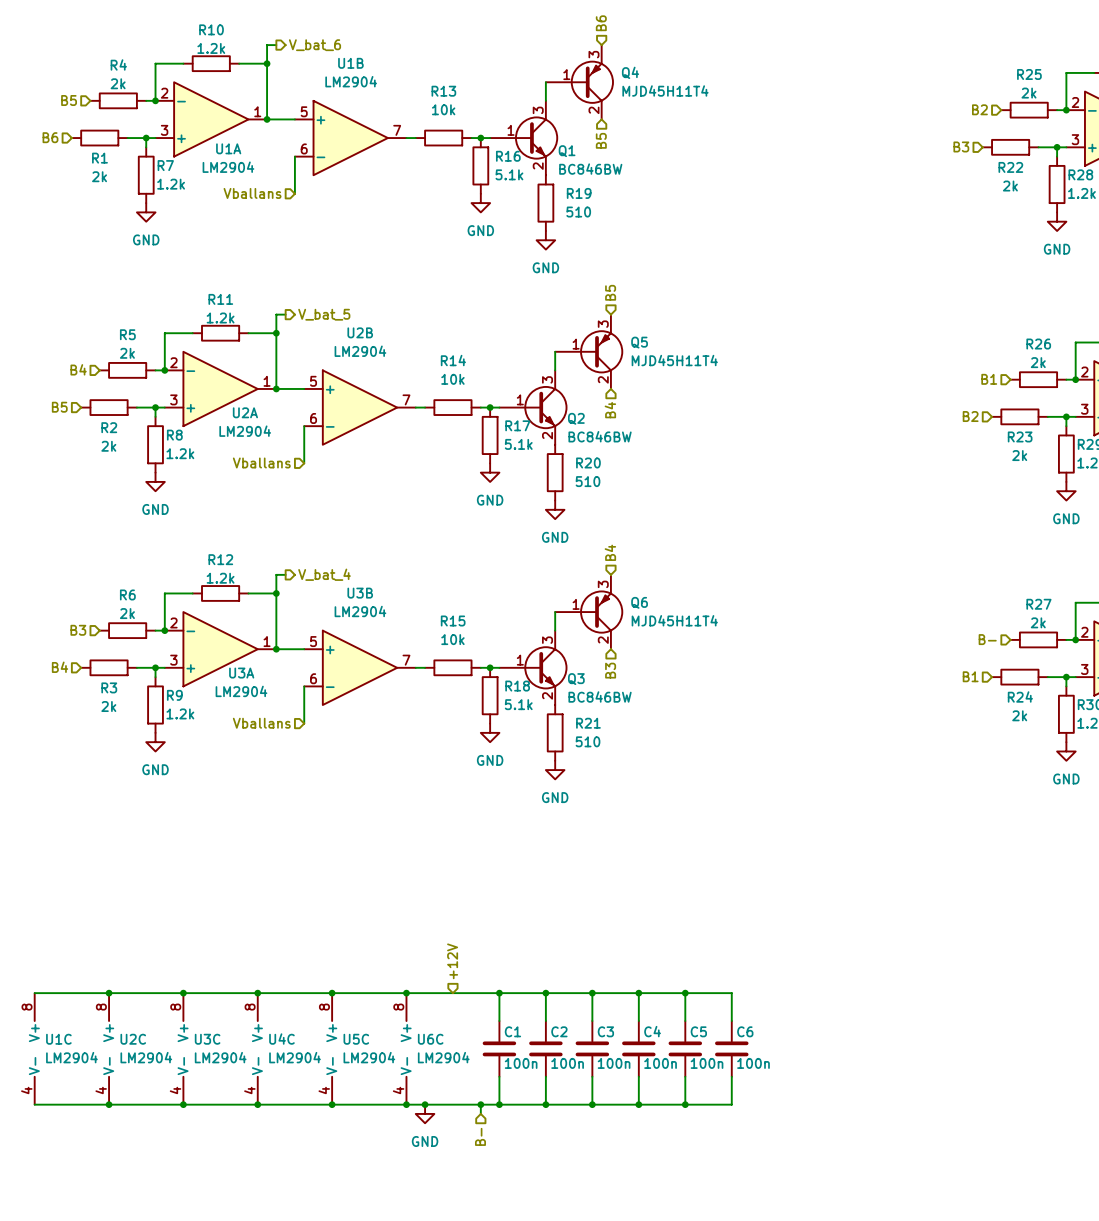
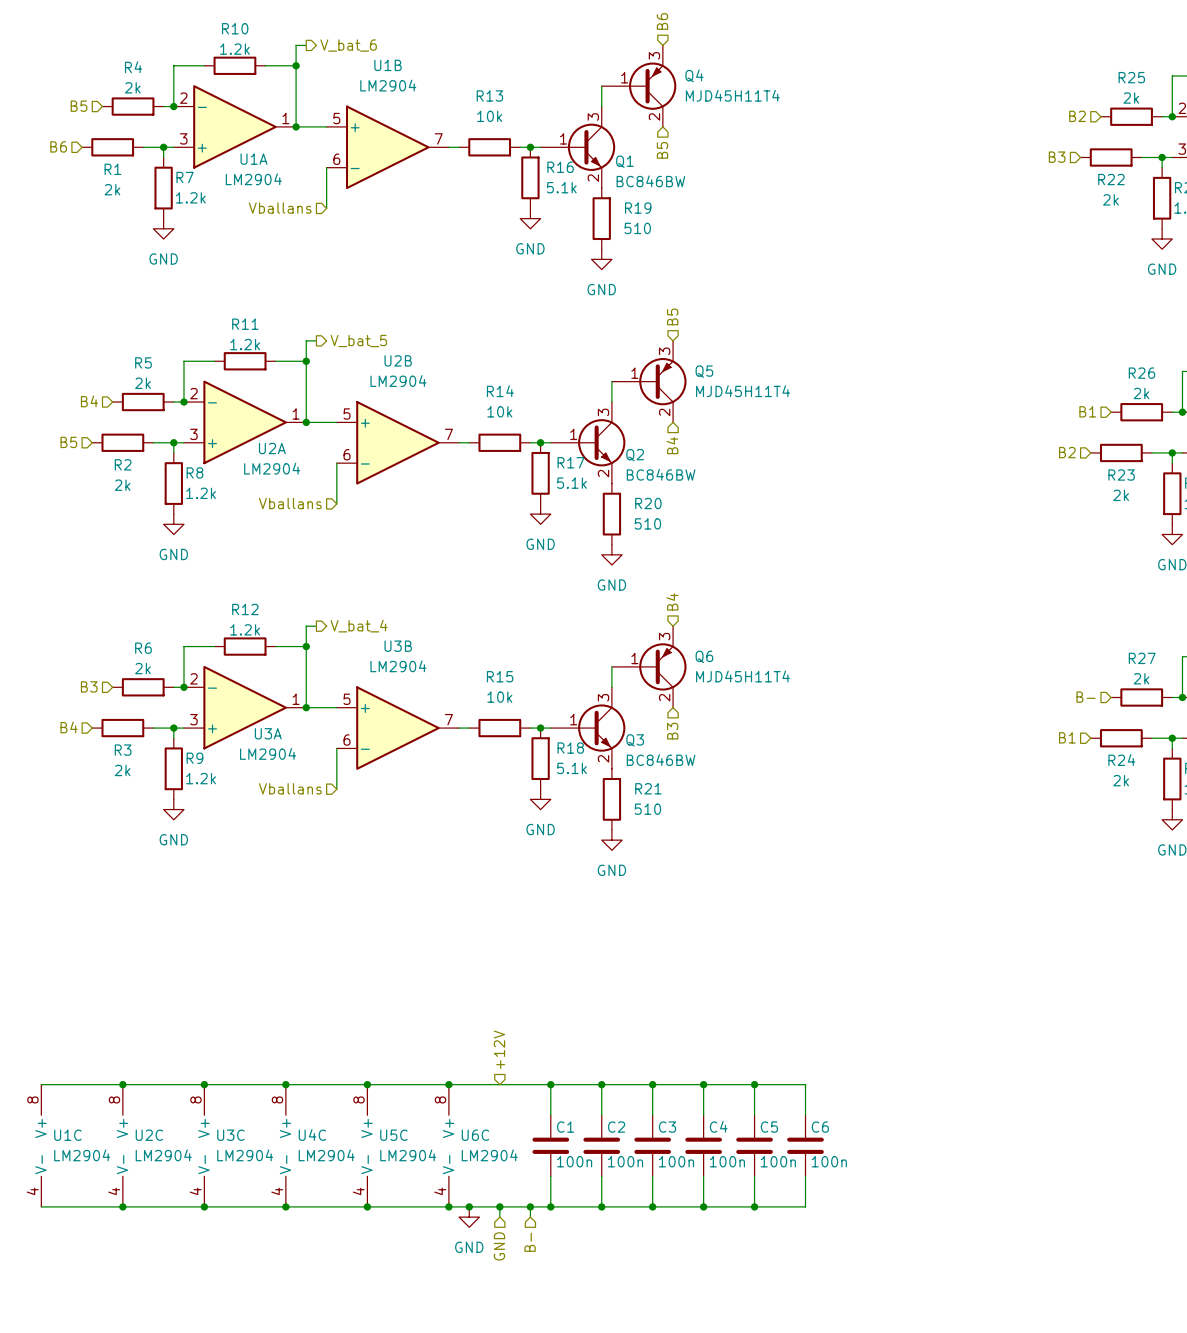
wire: none -> (499, 1206) (499, 1217)
junction: none -> (499, 1206)
hierarchical label: none -> GND (499, 1246)

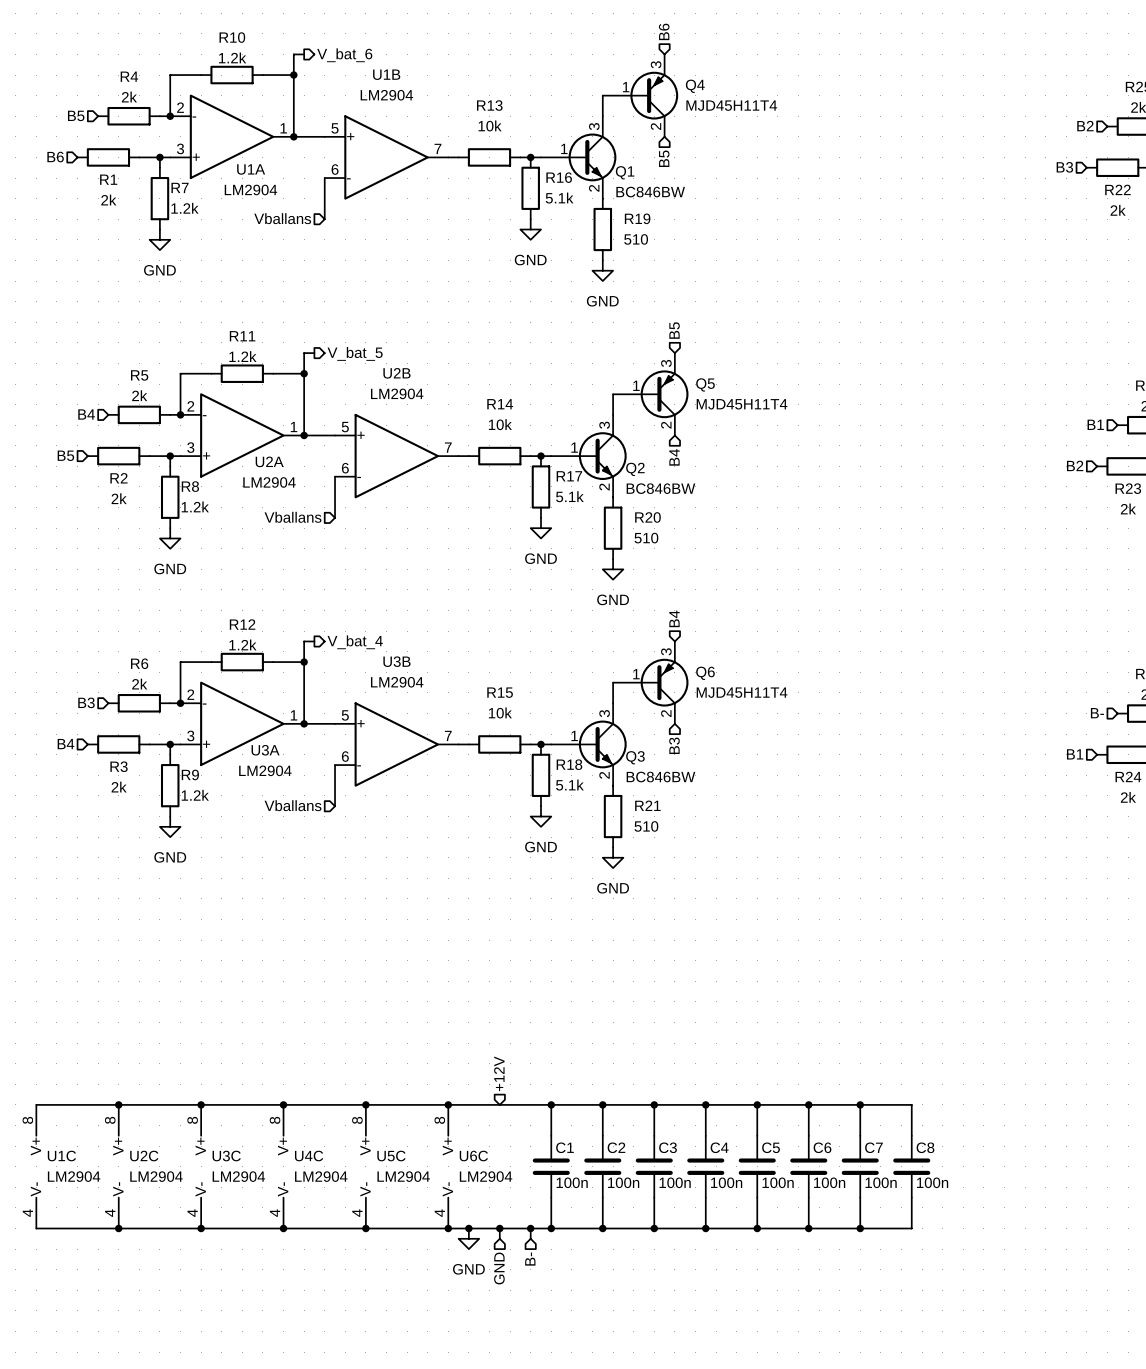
wire: none -> (808, 1104) (911, 1104) (911, 1135)
junction: none -> (808, 1104)
wire: none -> (860, 1104) (860, 1135)
junction: none -> (860, 1104)
C7: none -> 100n (860, 1166)
C8: none -> 100n (911, 1166)
wire: none -> (860, 1197) (860, 1228)
wire: none -> (911, 1197) (911, 1228) (808, 1228)
junction: none -> (808, 1228)
junction: none -> (860, 1228)

